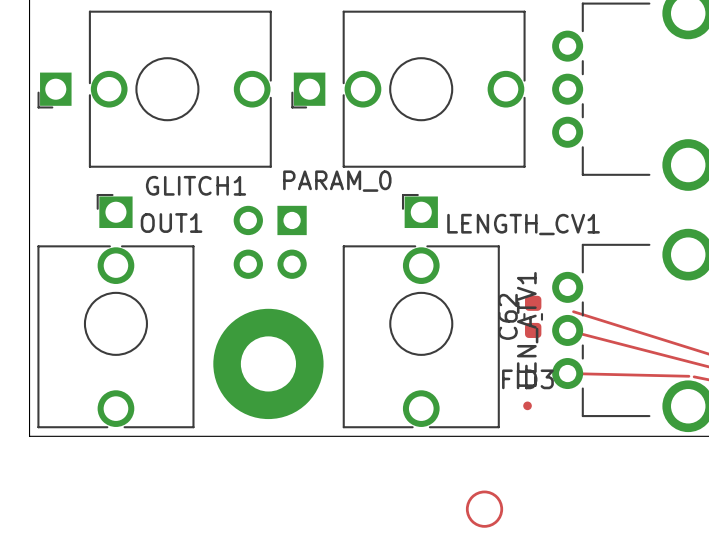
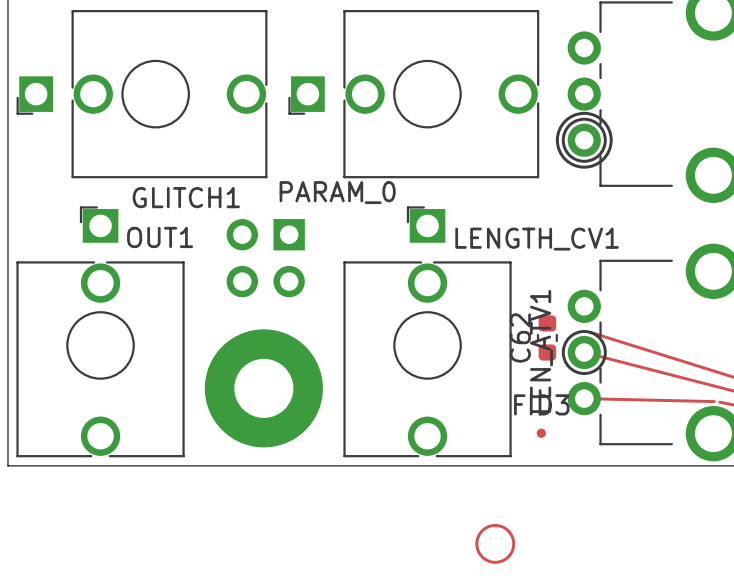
drawing: none -> [555, 111, 613, 169]
drawing: none -> [561, 329, 607, 376]

